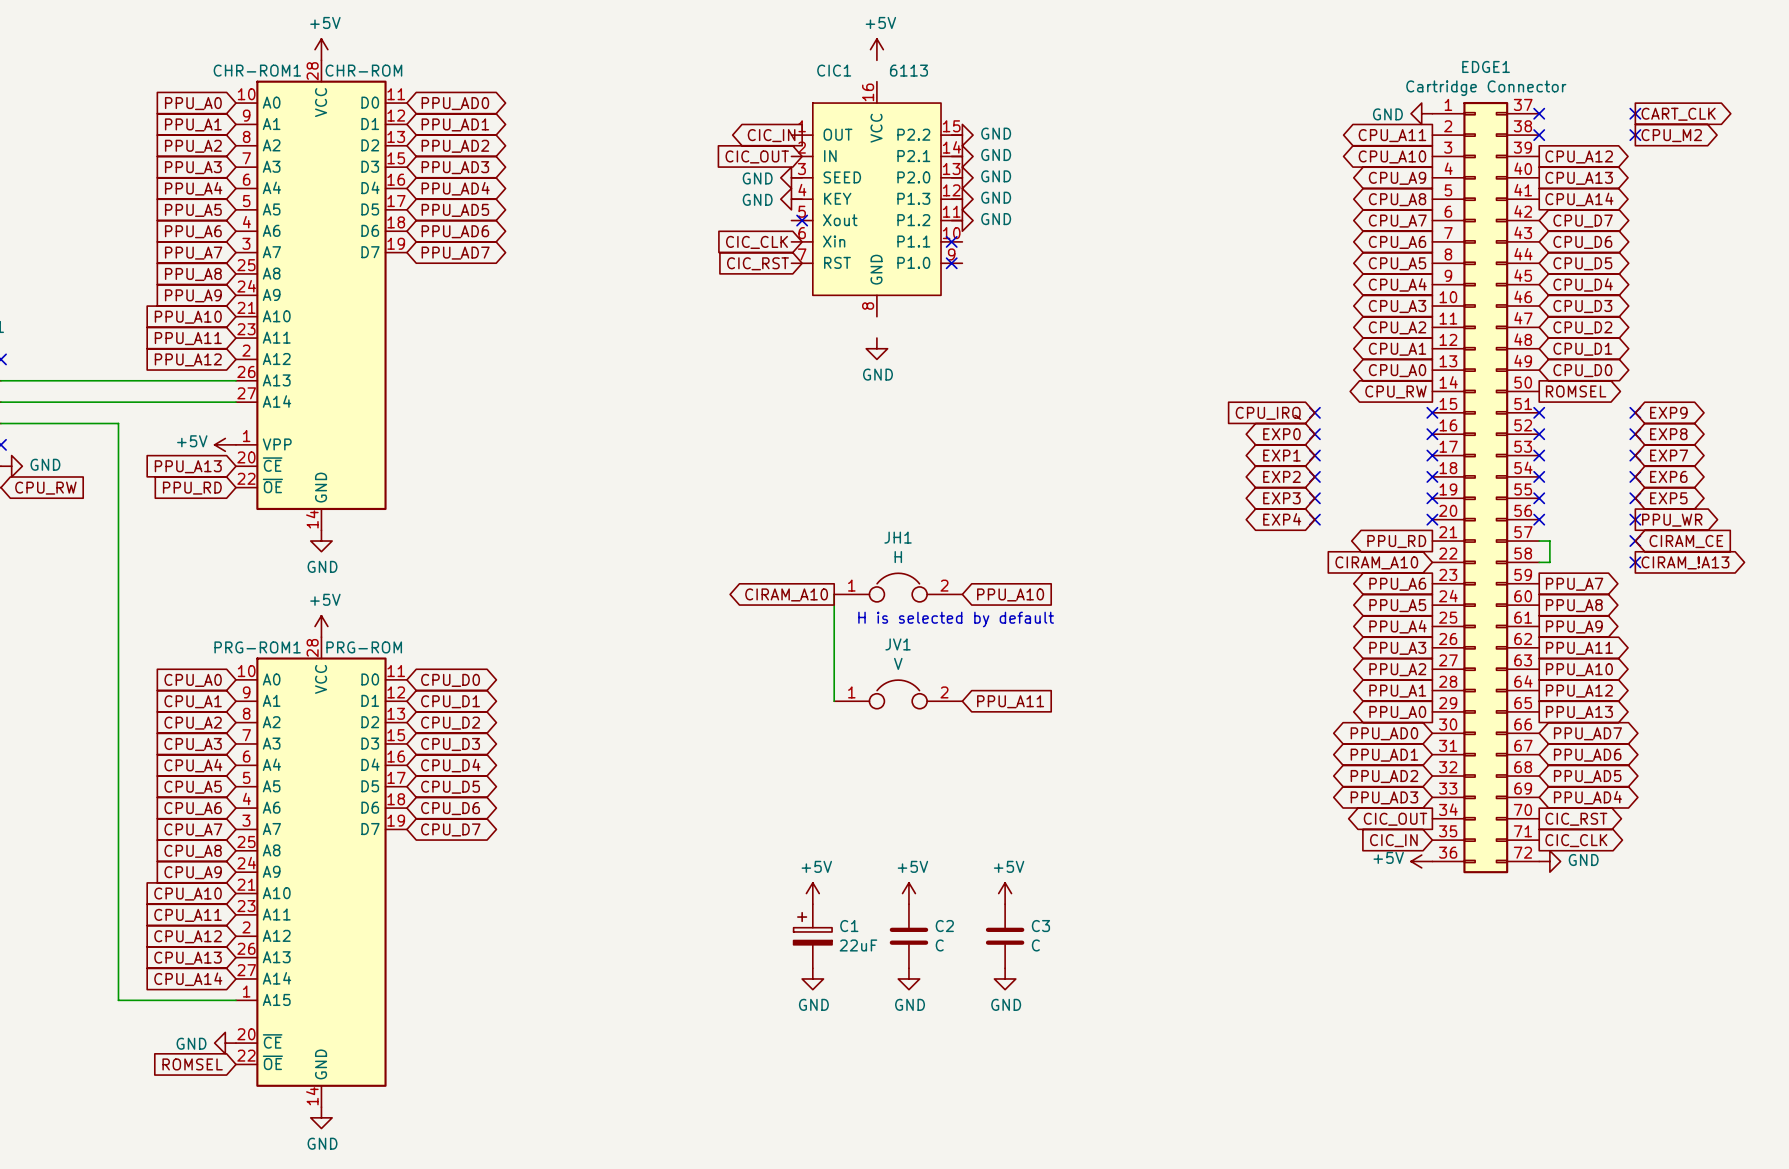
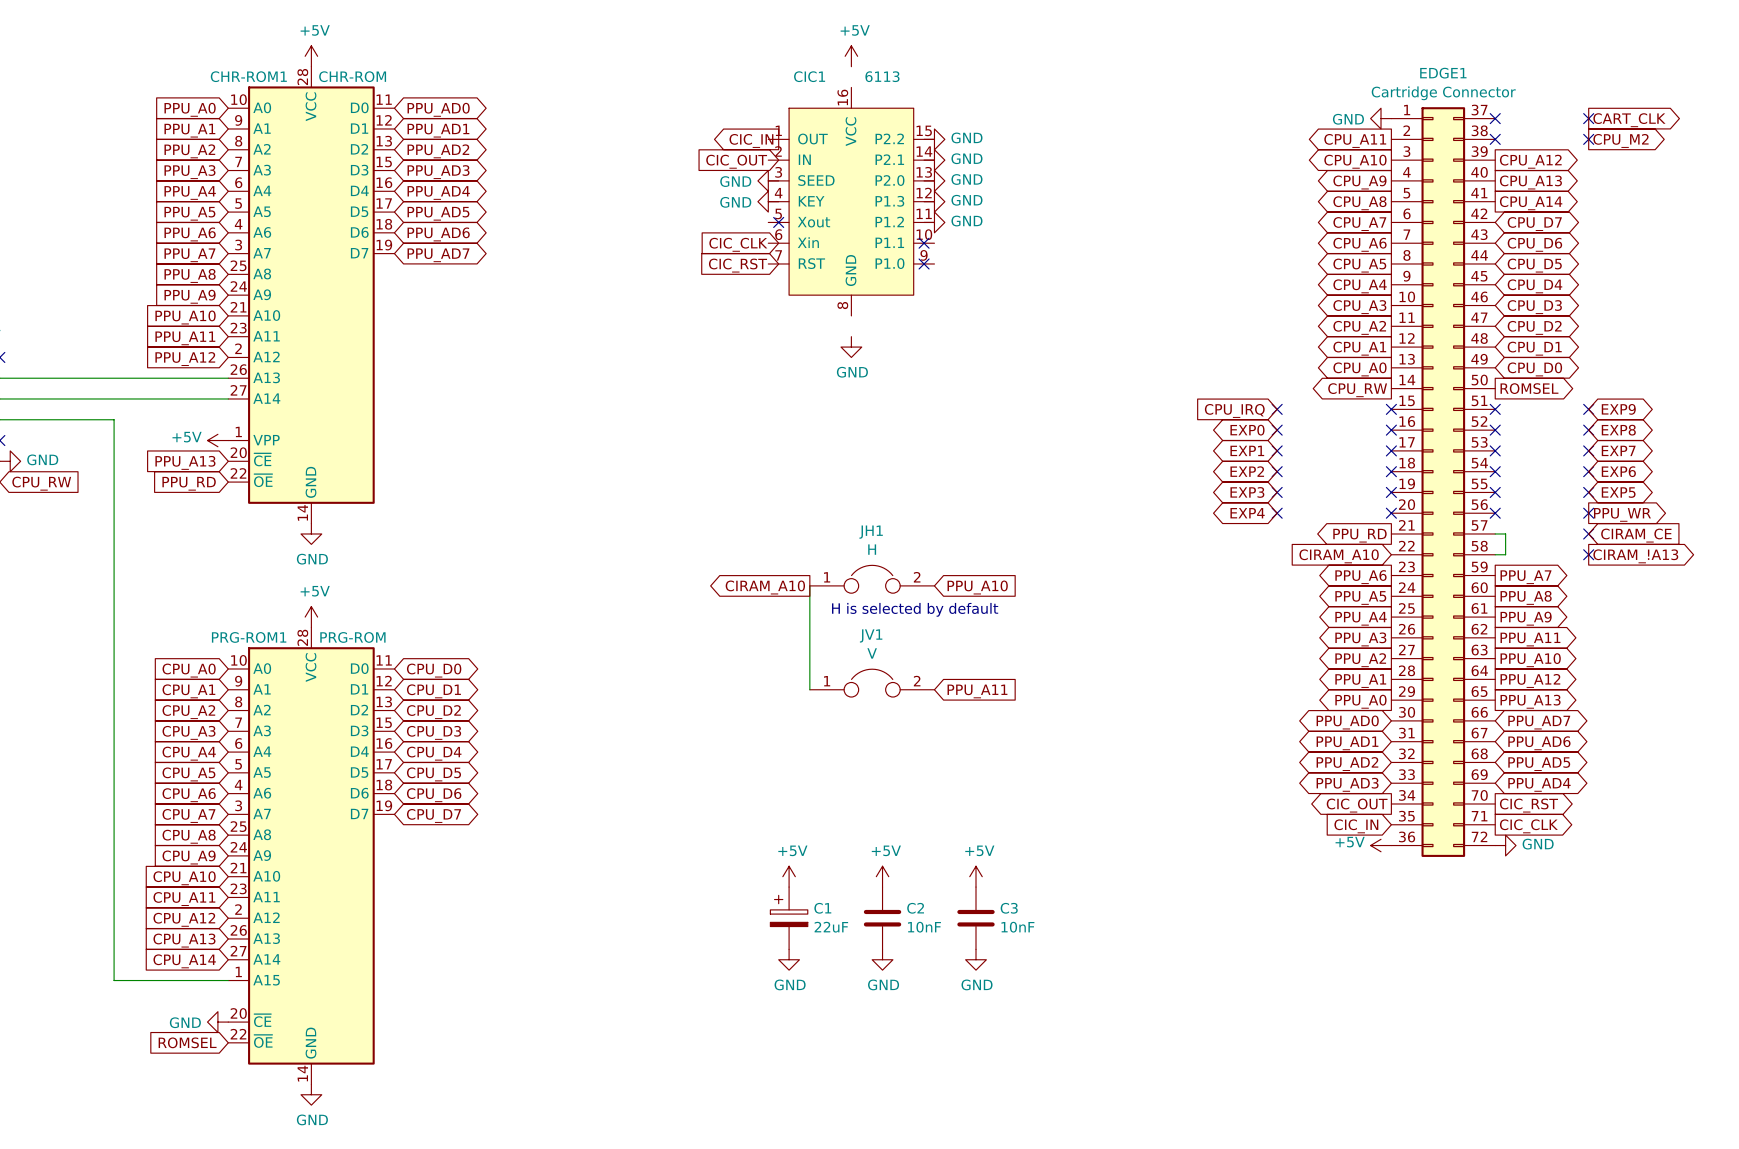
C2 value: C (939, 945) -> 10nF (924, 927)
C3 value: C (1035, 945) -> 10nF (1017, 927)

